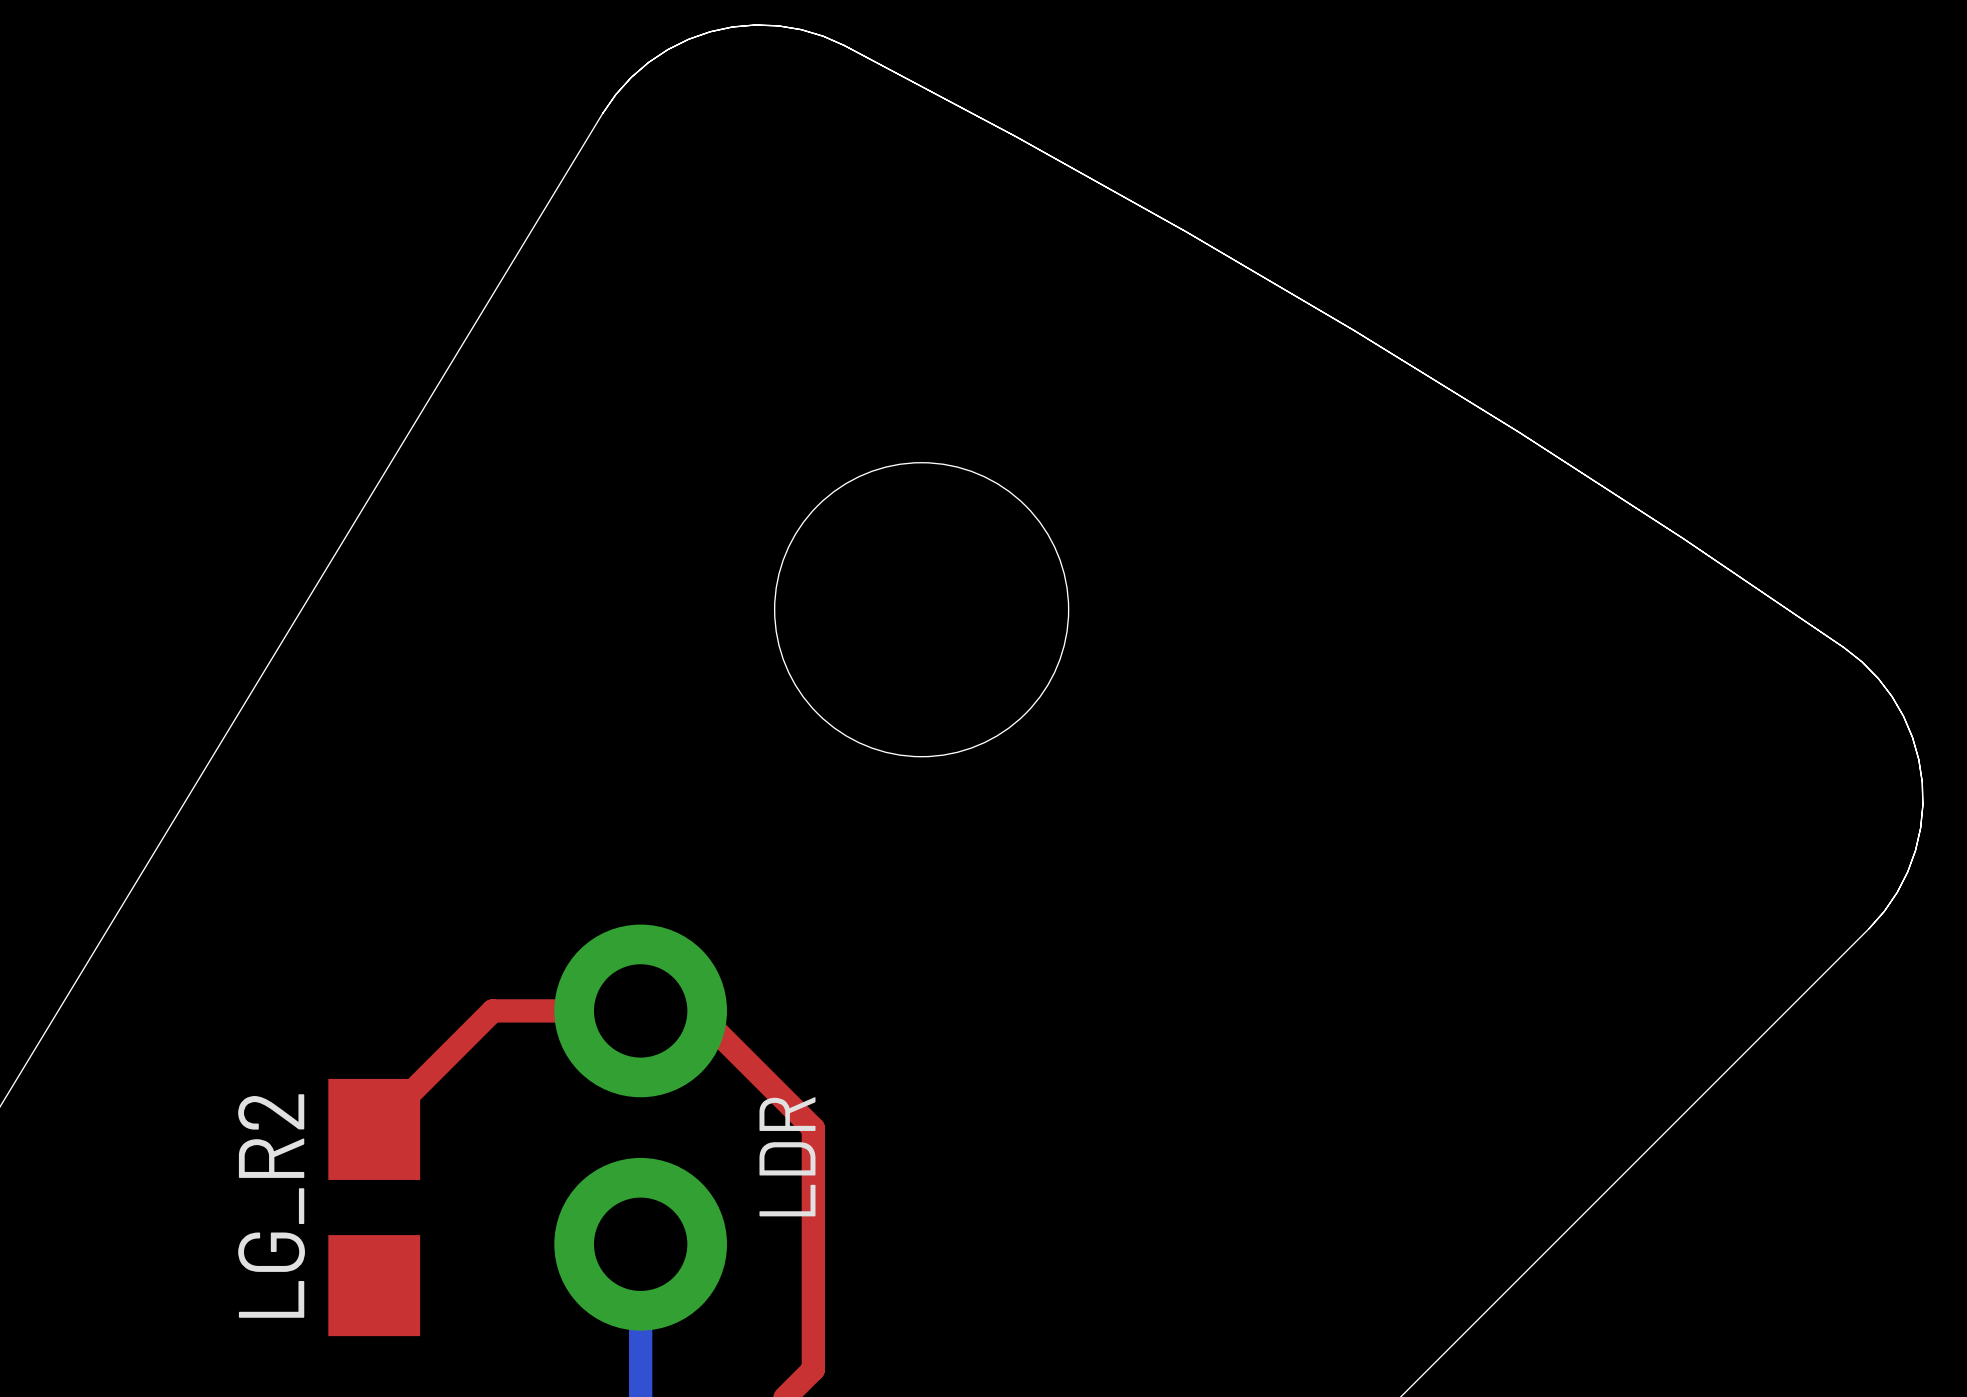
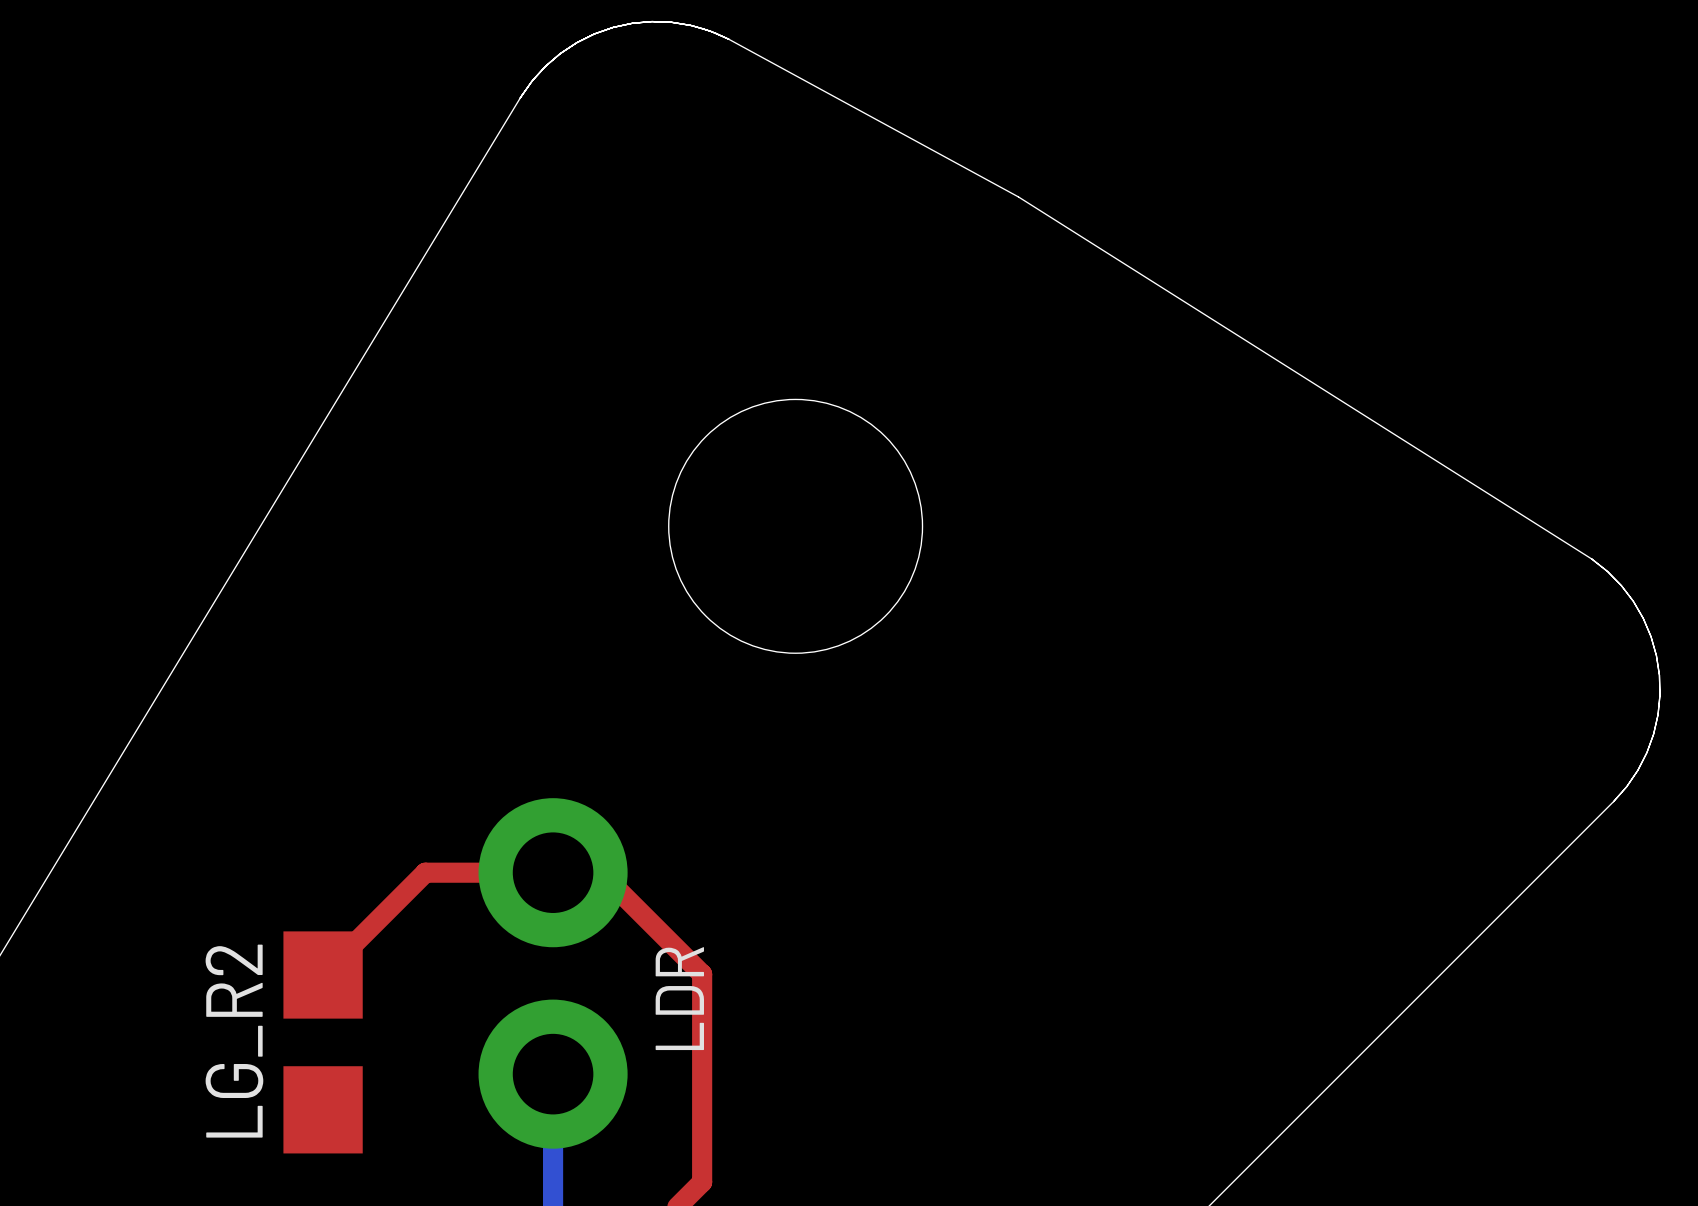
board edge: (844, 45) (1016, 136) (1186, 231) (1353, 330) (1519, 432) (1682, 538) (1844, 647) (1682, 538) (1519, 432) (1353, 330) (1186, 231) (1016, 136) (844, 45) -> none
board edge: none -> (520, 97) (533, 79) (561, 52) (577, 42) (613, 27) (632, 23) (670, 22) (689, 25) (716, 33) (1018, 196) (1591, 559)

